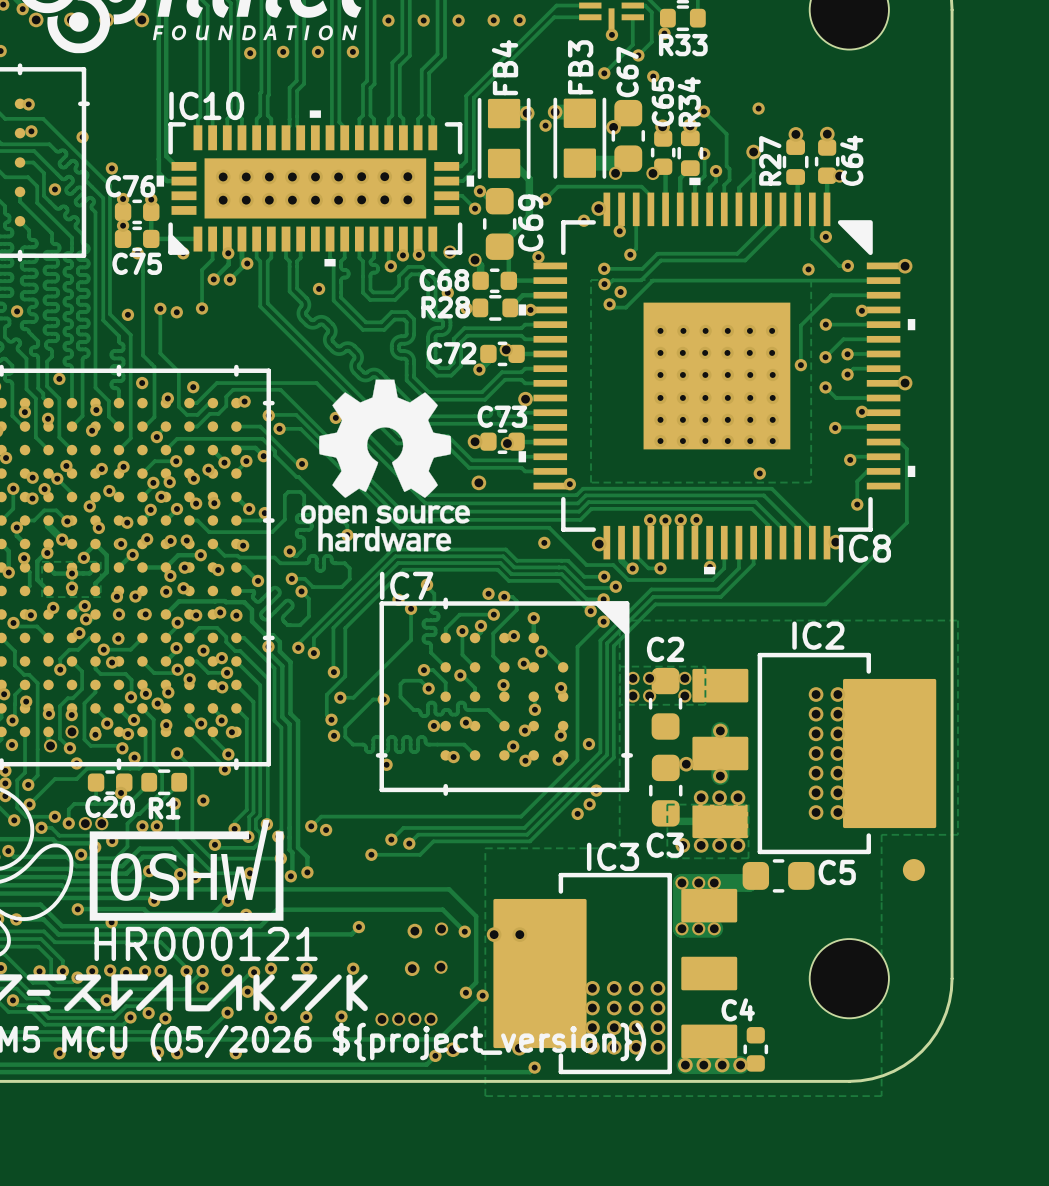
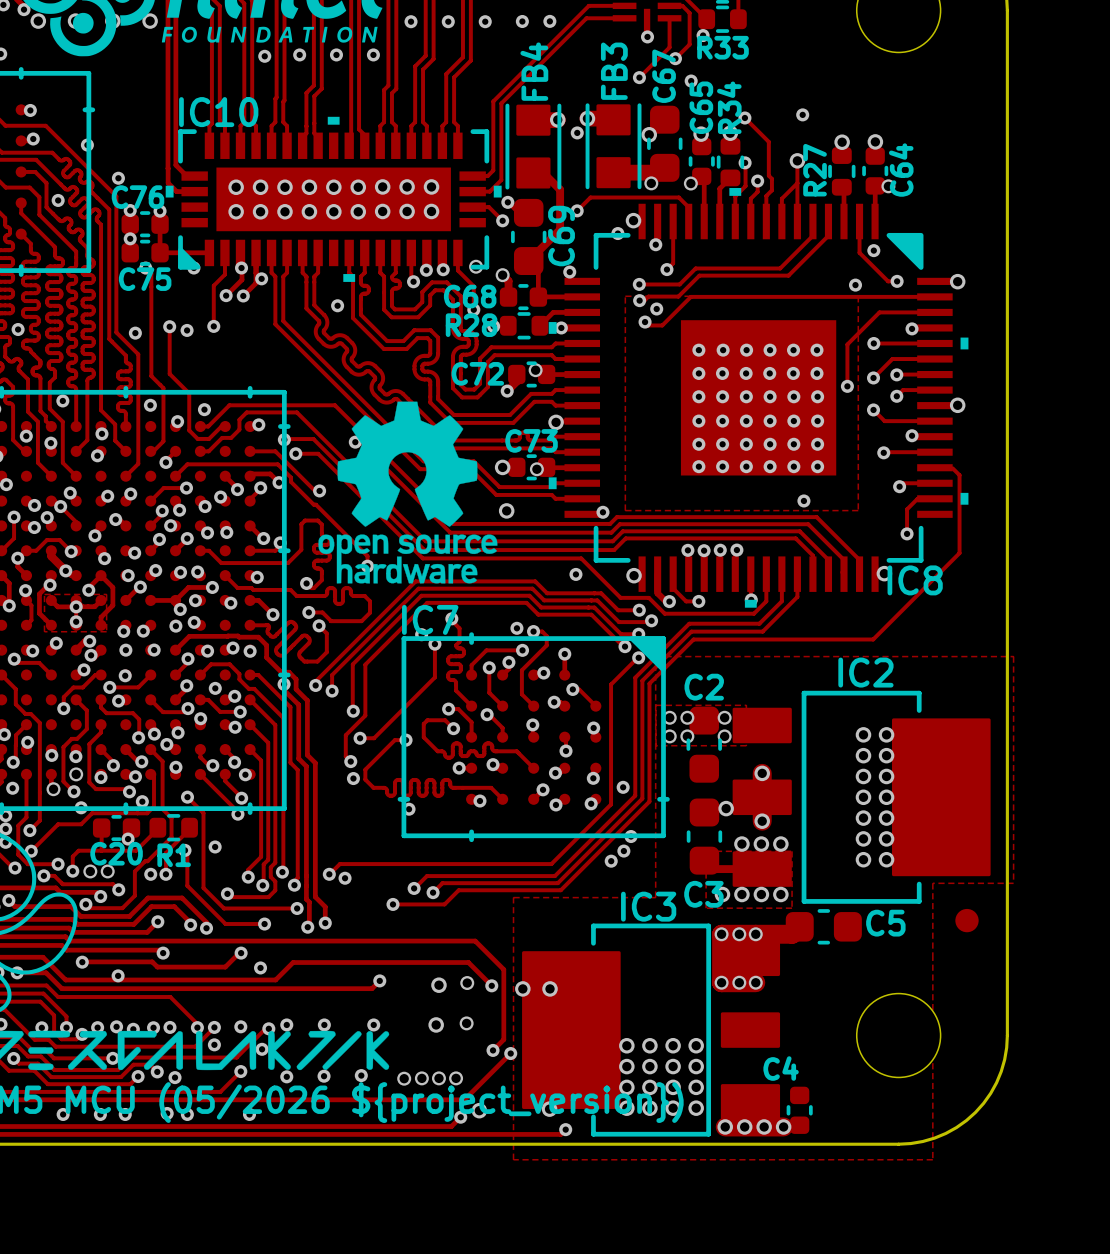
drawing: [89, 819, 284, 921] -> none
text: HR000121 (206, 943) -> none

